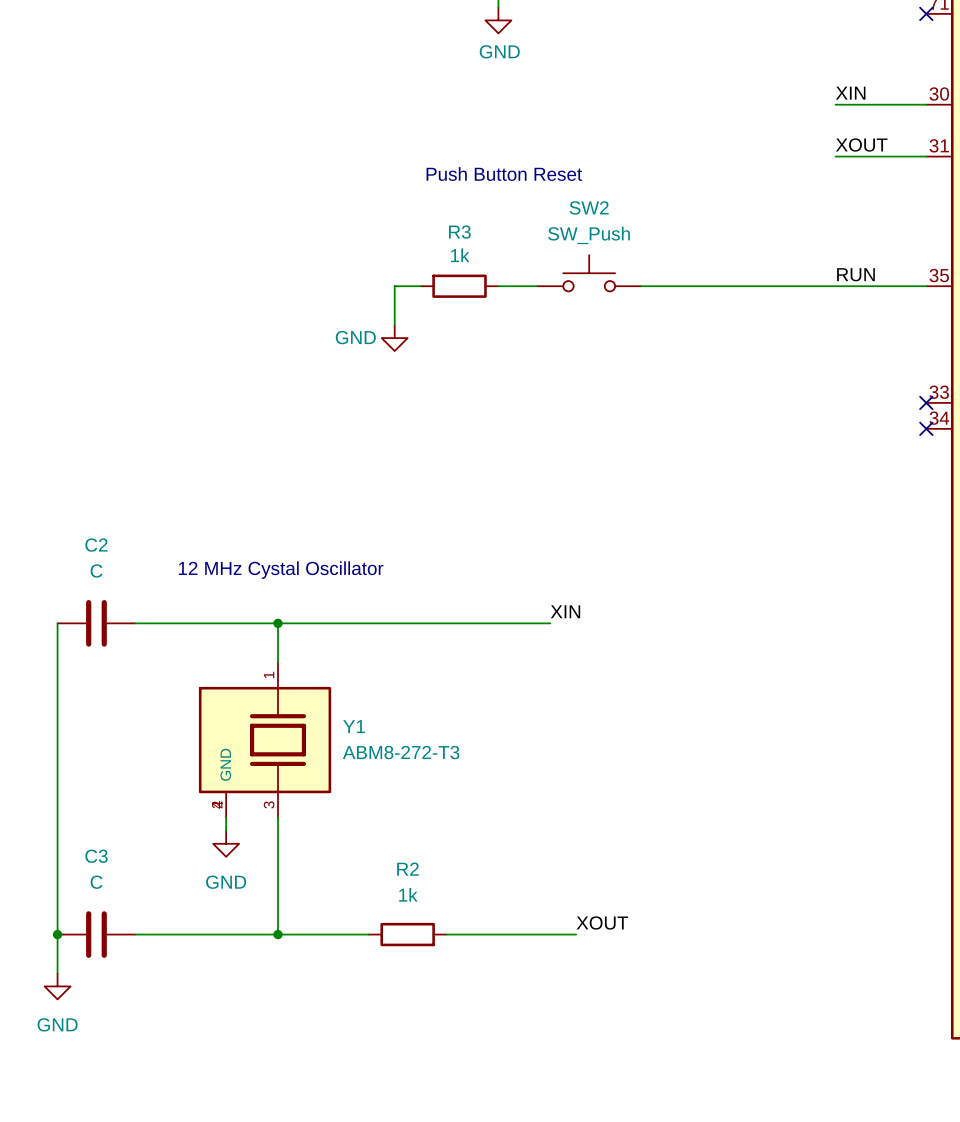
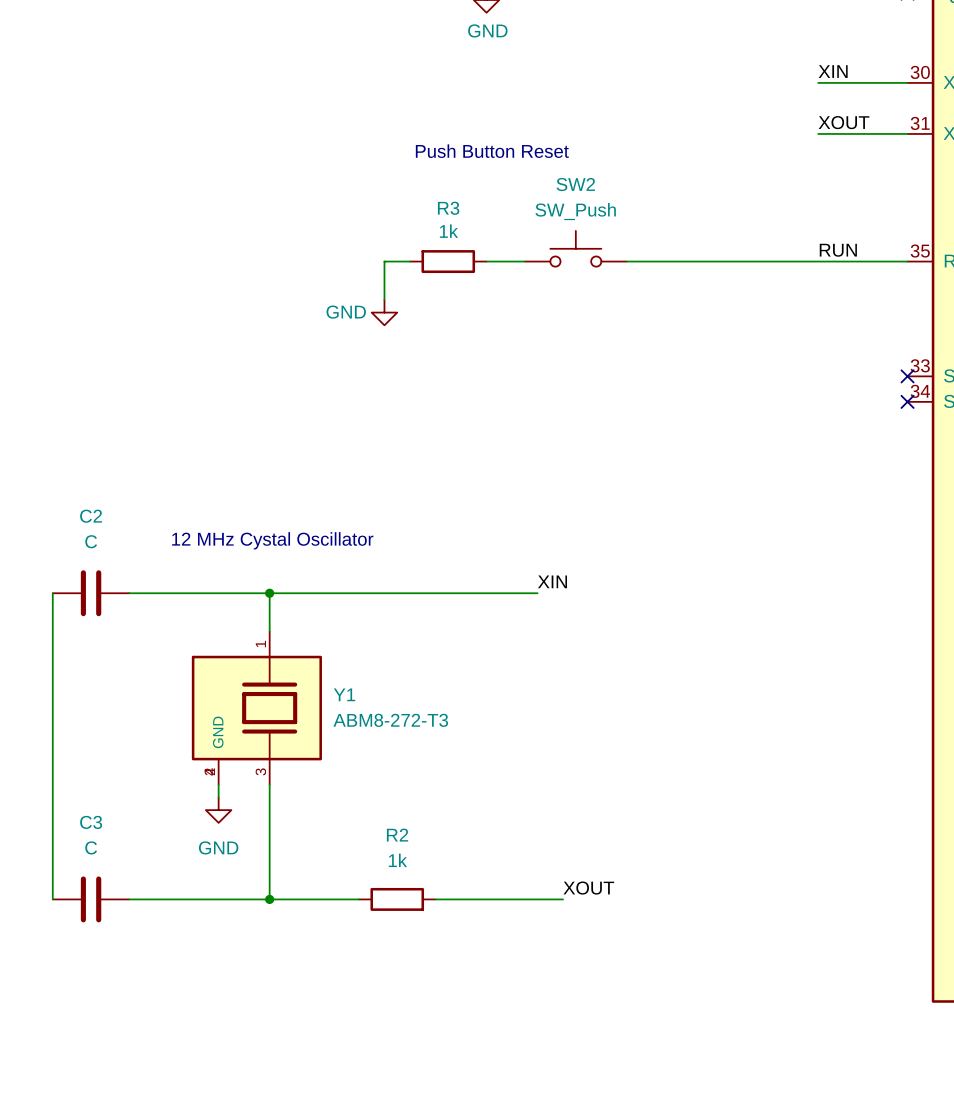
wire: (57, 934) (57, 973) -> none
junction: (57, 934) -> none
power symbol: GND (57, 986) -> none

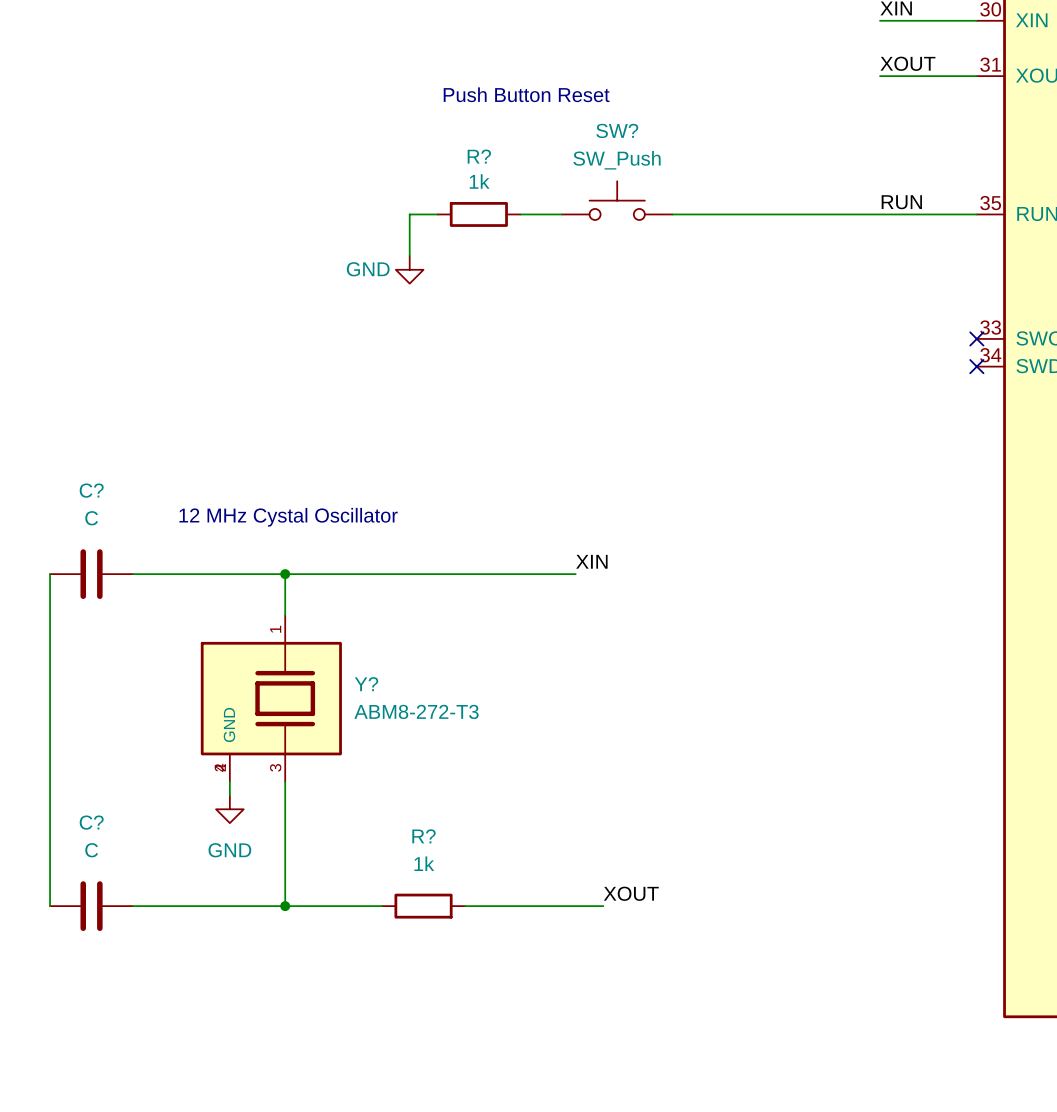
SW2 name: SW2 (575, 184) -> SW? (617, 130)
R3 name: R3 (448, 208) -> R? (479, 156)
C2 name: C2 (91, 516) -> C? (91, 490)
Y1 name: Y1 (344, 694) -> Y? (366, 684)
C3 name: C3 (91, 822) -> C? (91, 822)
R2 name: R2 (397, 835) -> R? (423, 836)

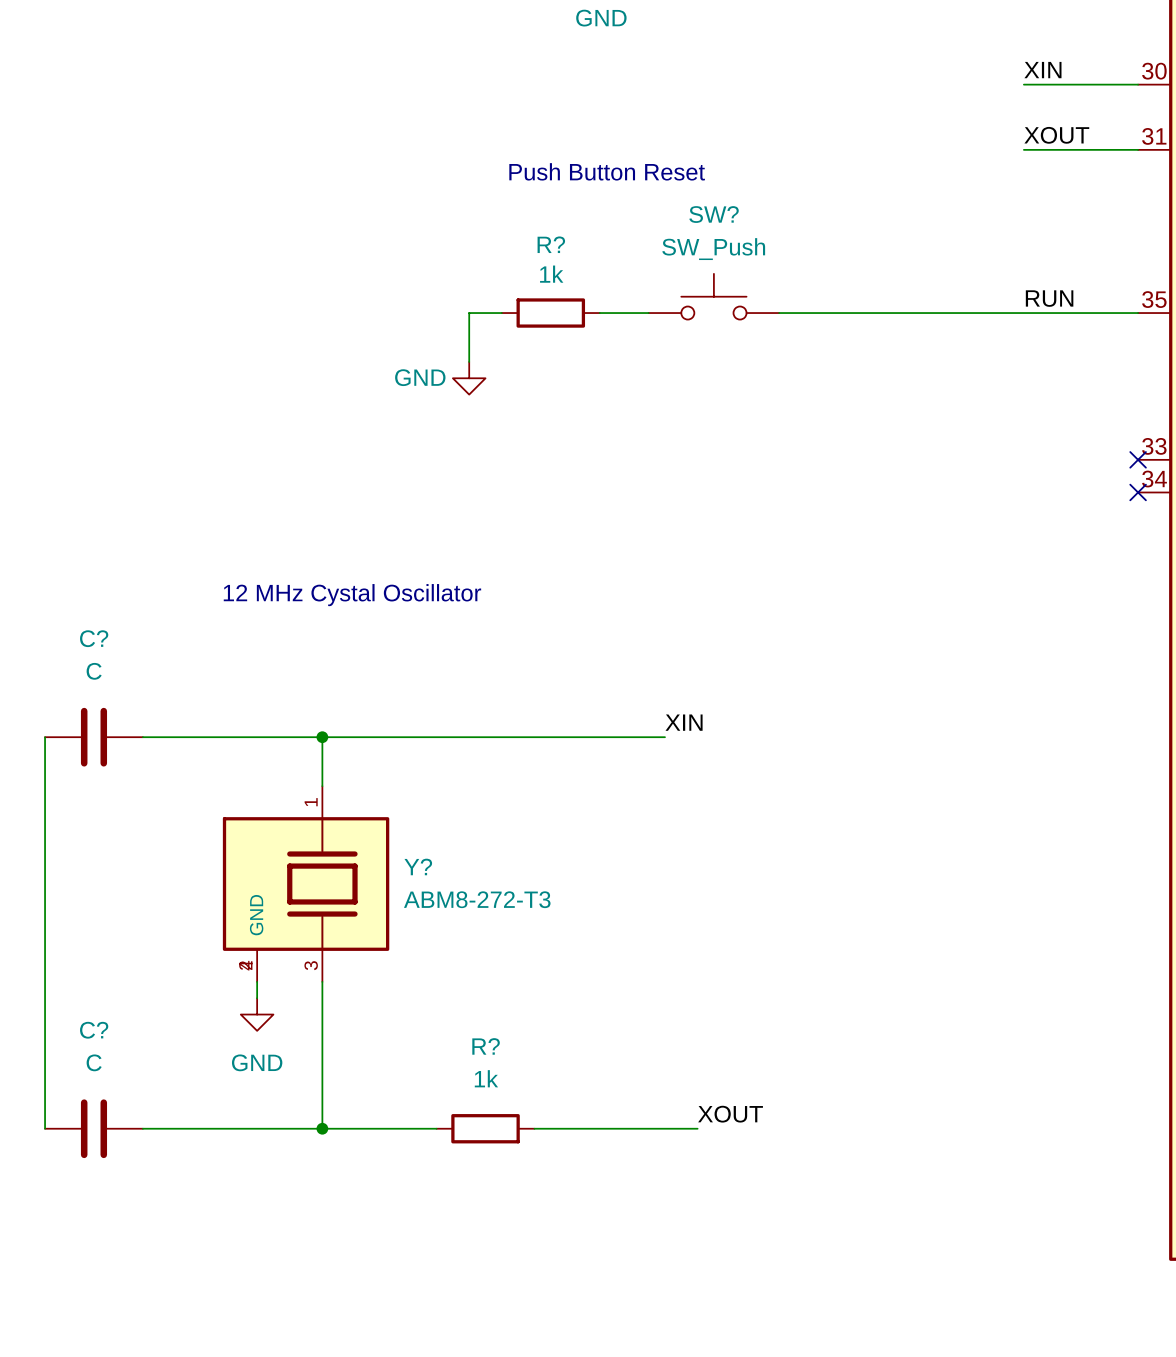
text position: 12 MHz Cystal Oscillator (288, 517) -> 12 MHz Cystal Oscillator (352, 595)

